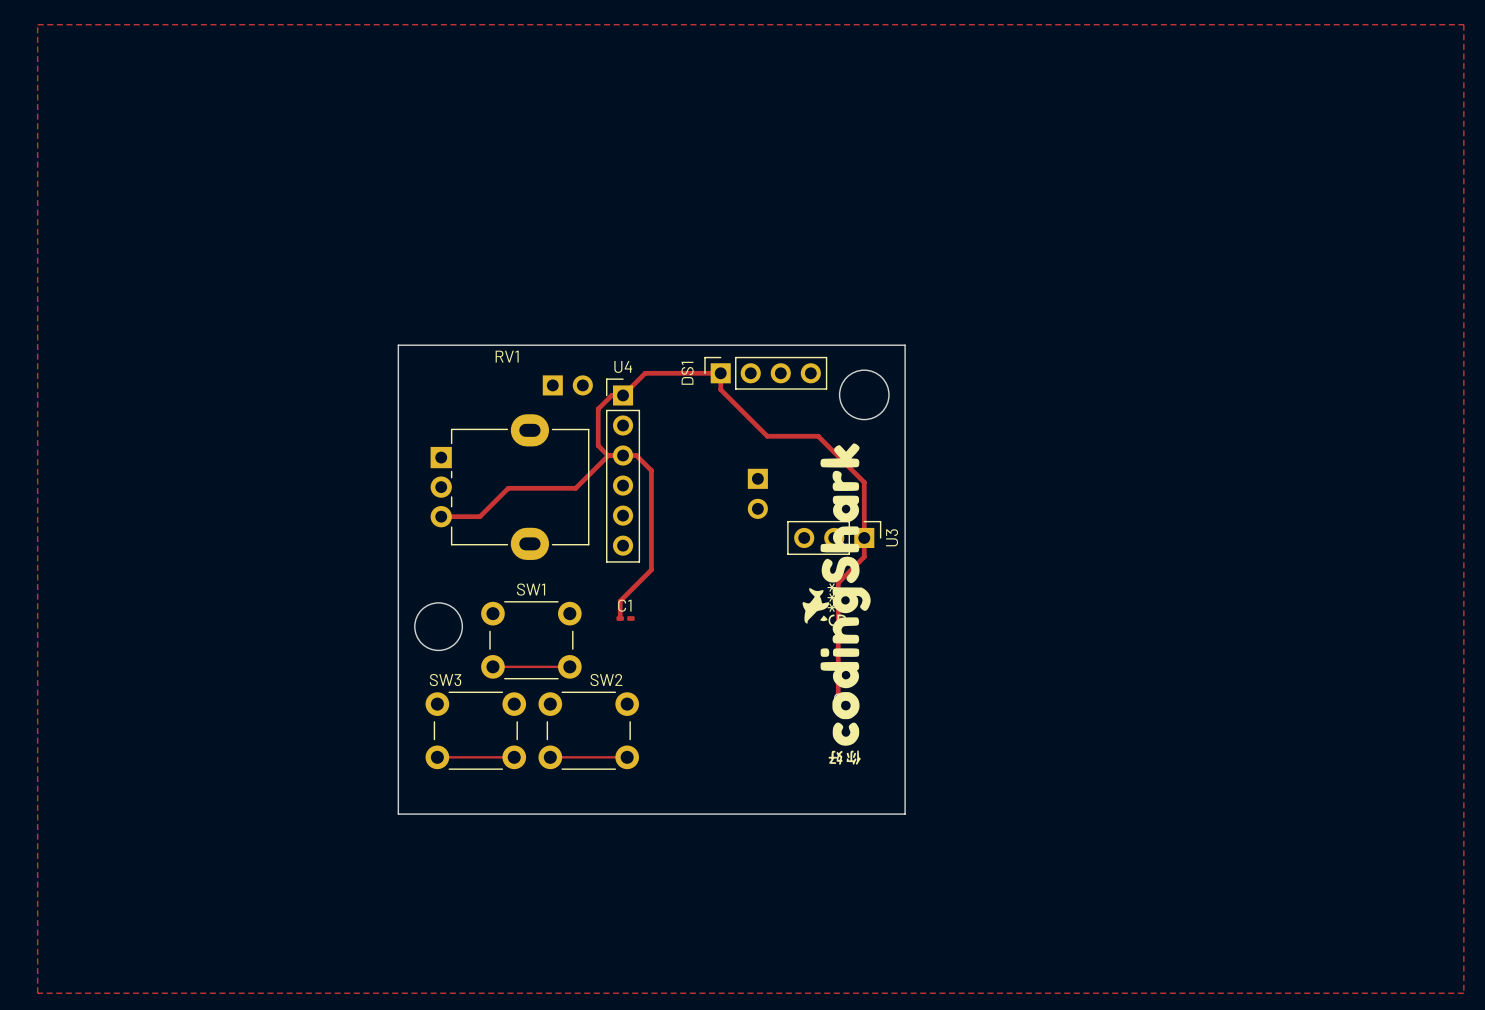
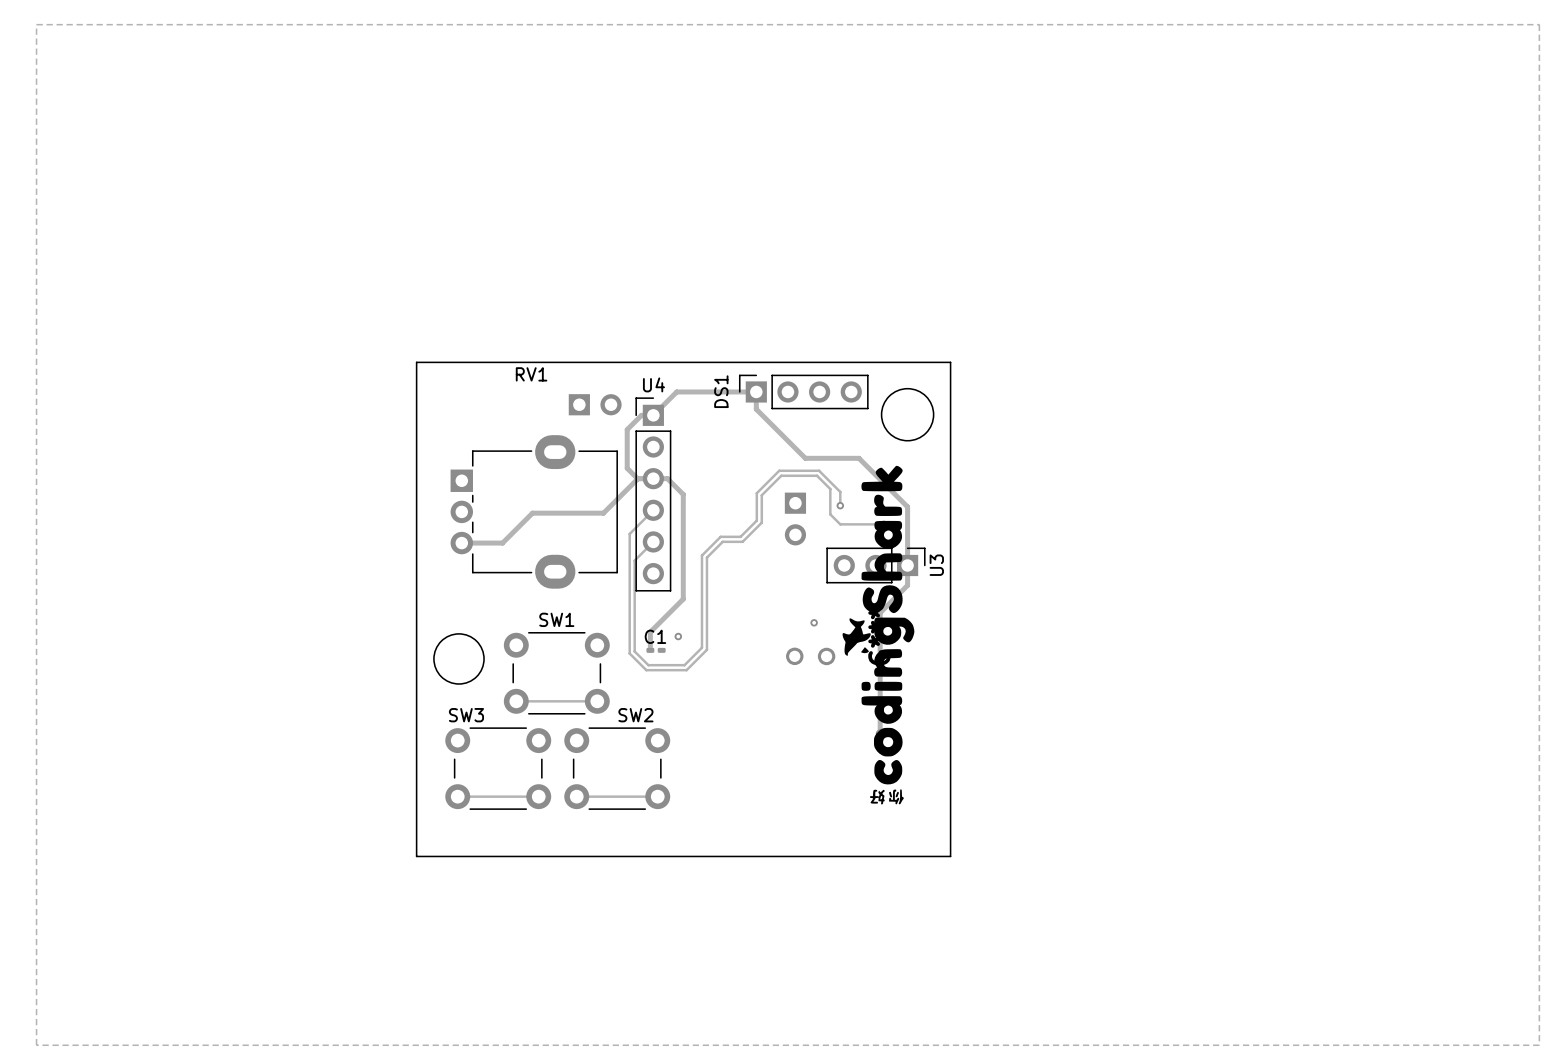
track: none -> (840, 505) (840, 491) (819, 470) (779, 470) (756, 493) (756, 520) (740, 536) (720, 536) (701, 555) (701, 647) (684, 665) (648, 665) (634, 651) (634, 560) (653, 541)
via: none -> (840, 505)
track: none -> (653, 510) (629, 533) (629, 653) (646, 670) (686, 670) (706, 649) (706, 557) (722, 541) (742, 541) (761, 522) (761, 495) (781, 475) (817, 475) (830, 489) (830, 514) (840, 524) (883, 524)
via: none -> (814, 622)
via: none -> (678, 636)
via: none -> (794, 656)
via: none -> (826, 656)

